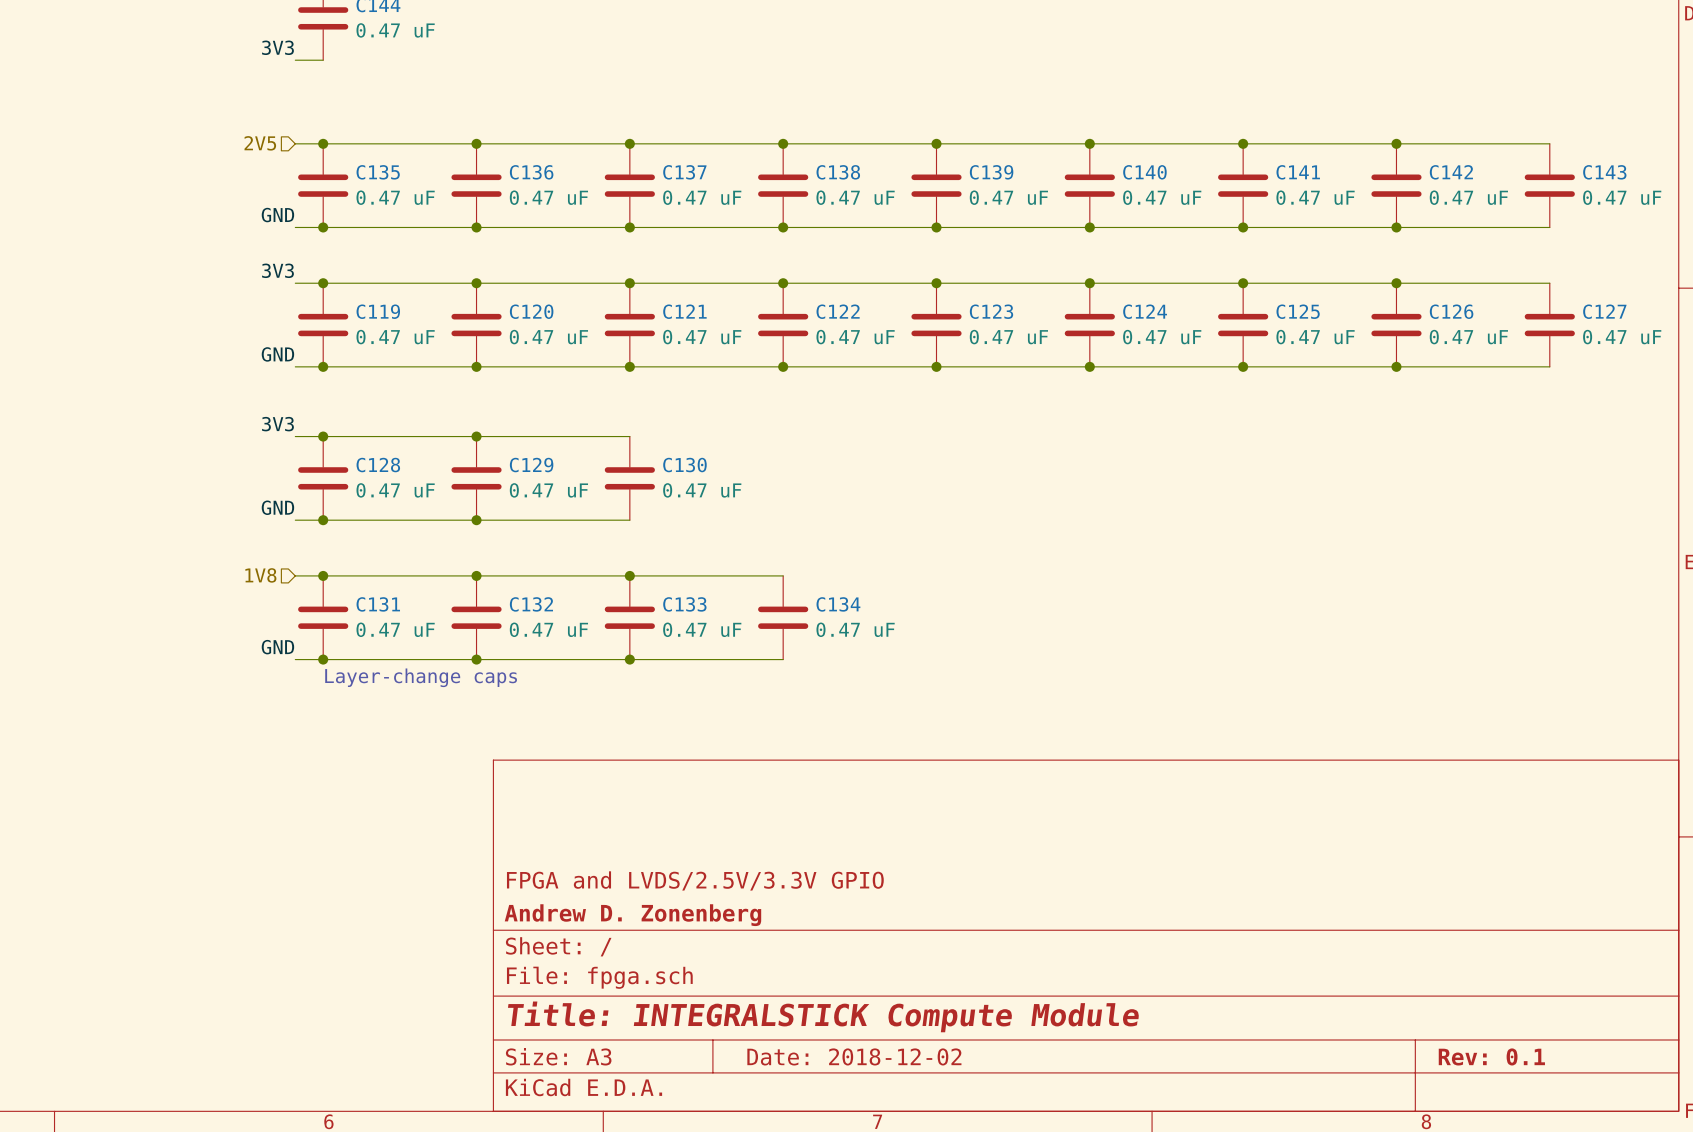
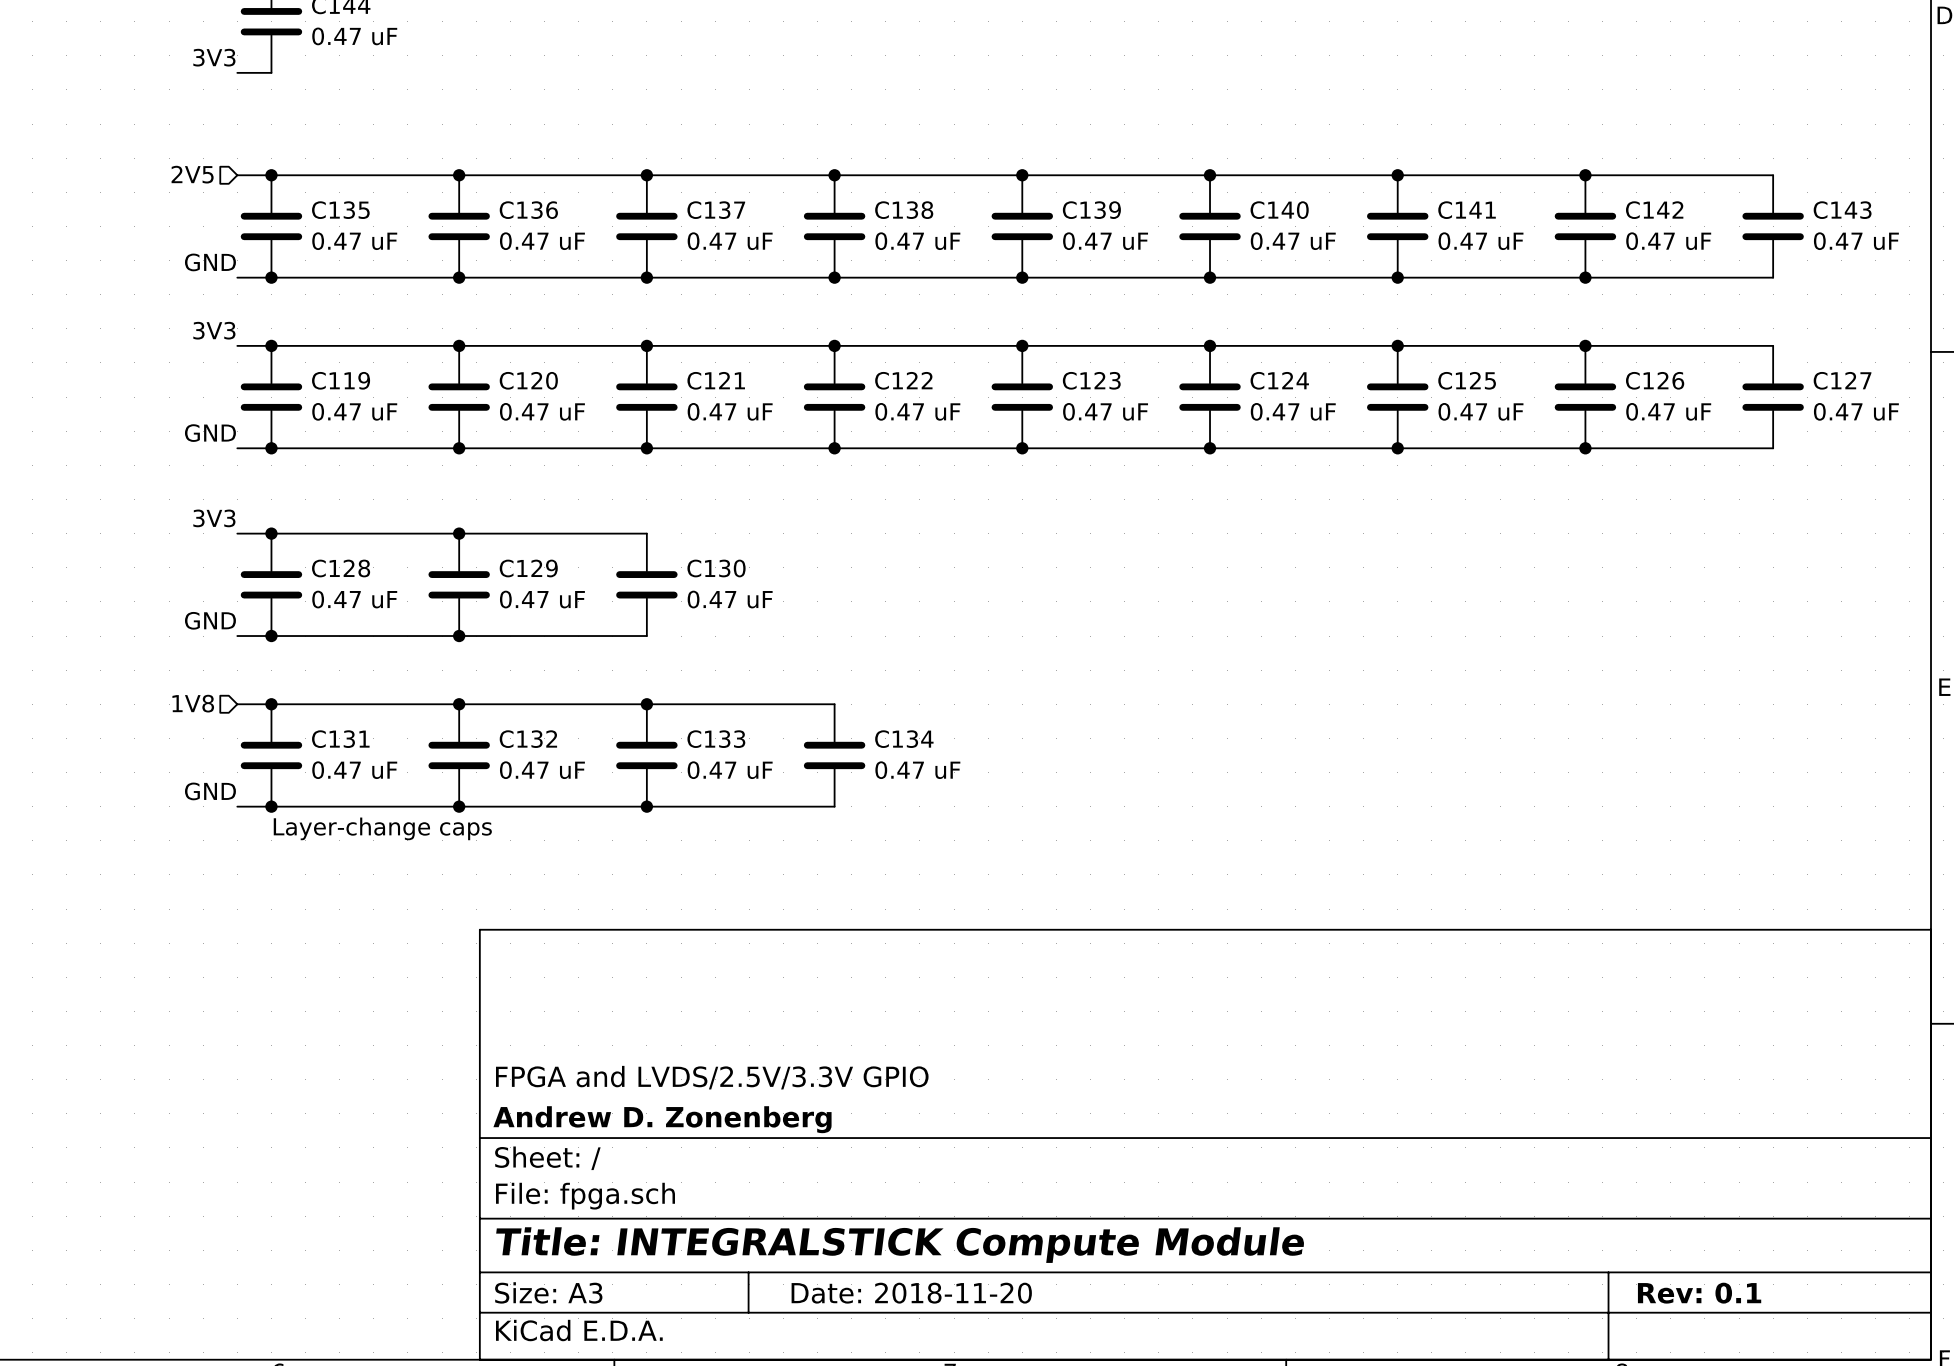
title block: Date: 2018-12-02 (854, 1056) -> Date: 2018-11-20 (911, 1293)

